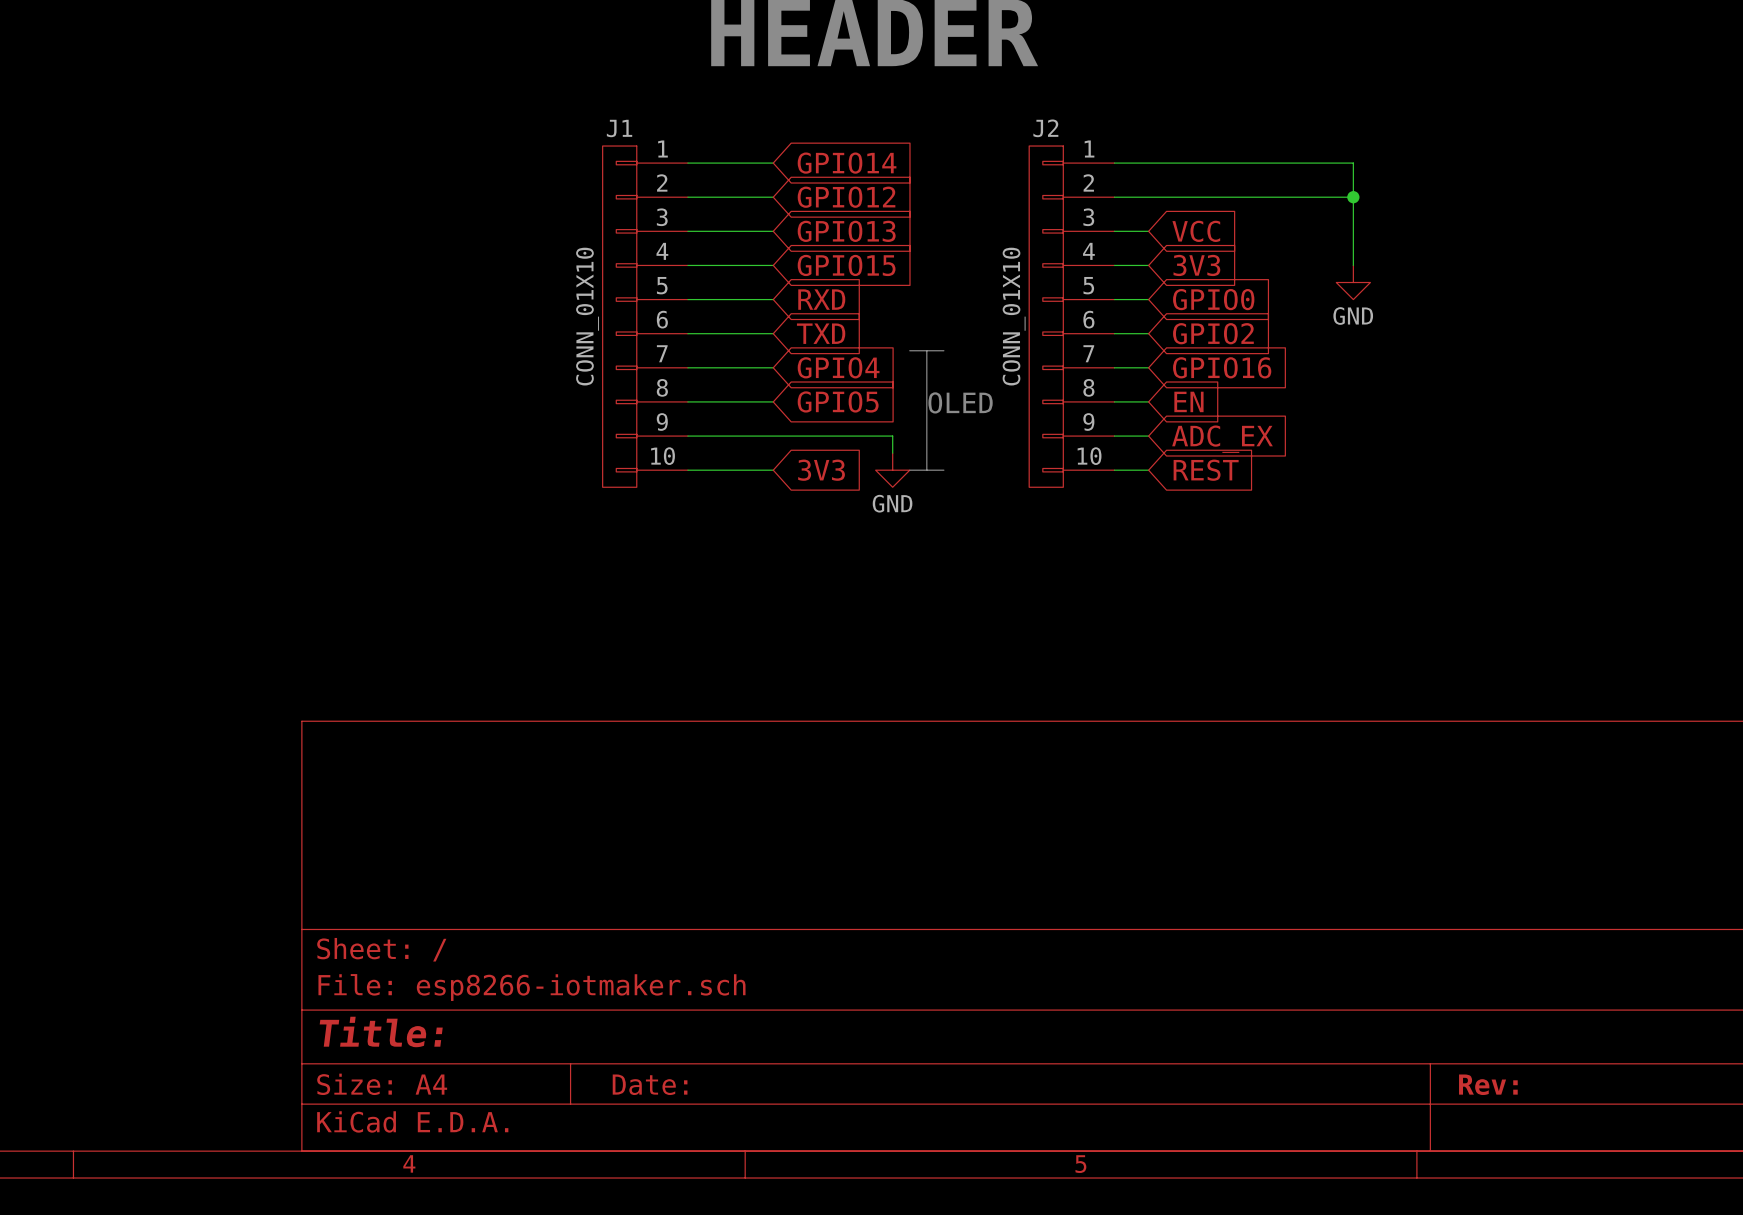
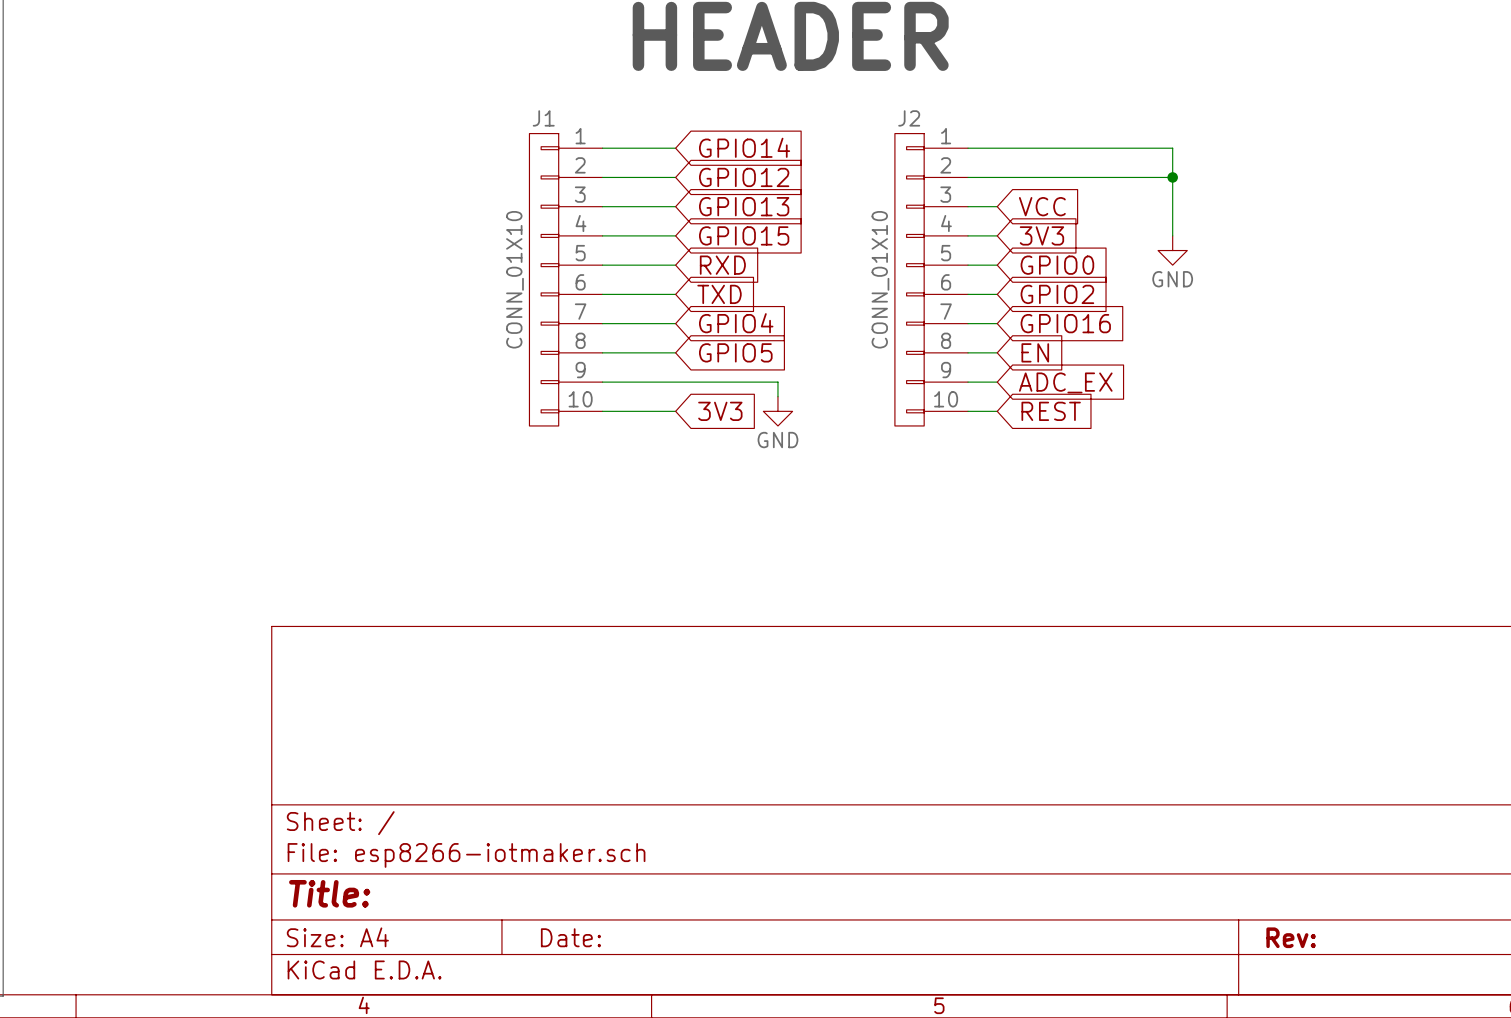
bus: (909, 350) (943, 350) -> none
bus: (926, 350) (926, 470) -> none
text: OLED (960, 402) -> none
bus: (909, 470) (943, 470) -> none

